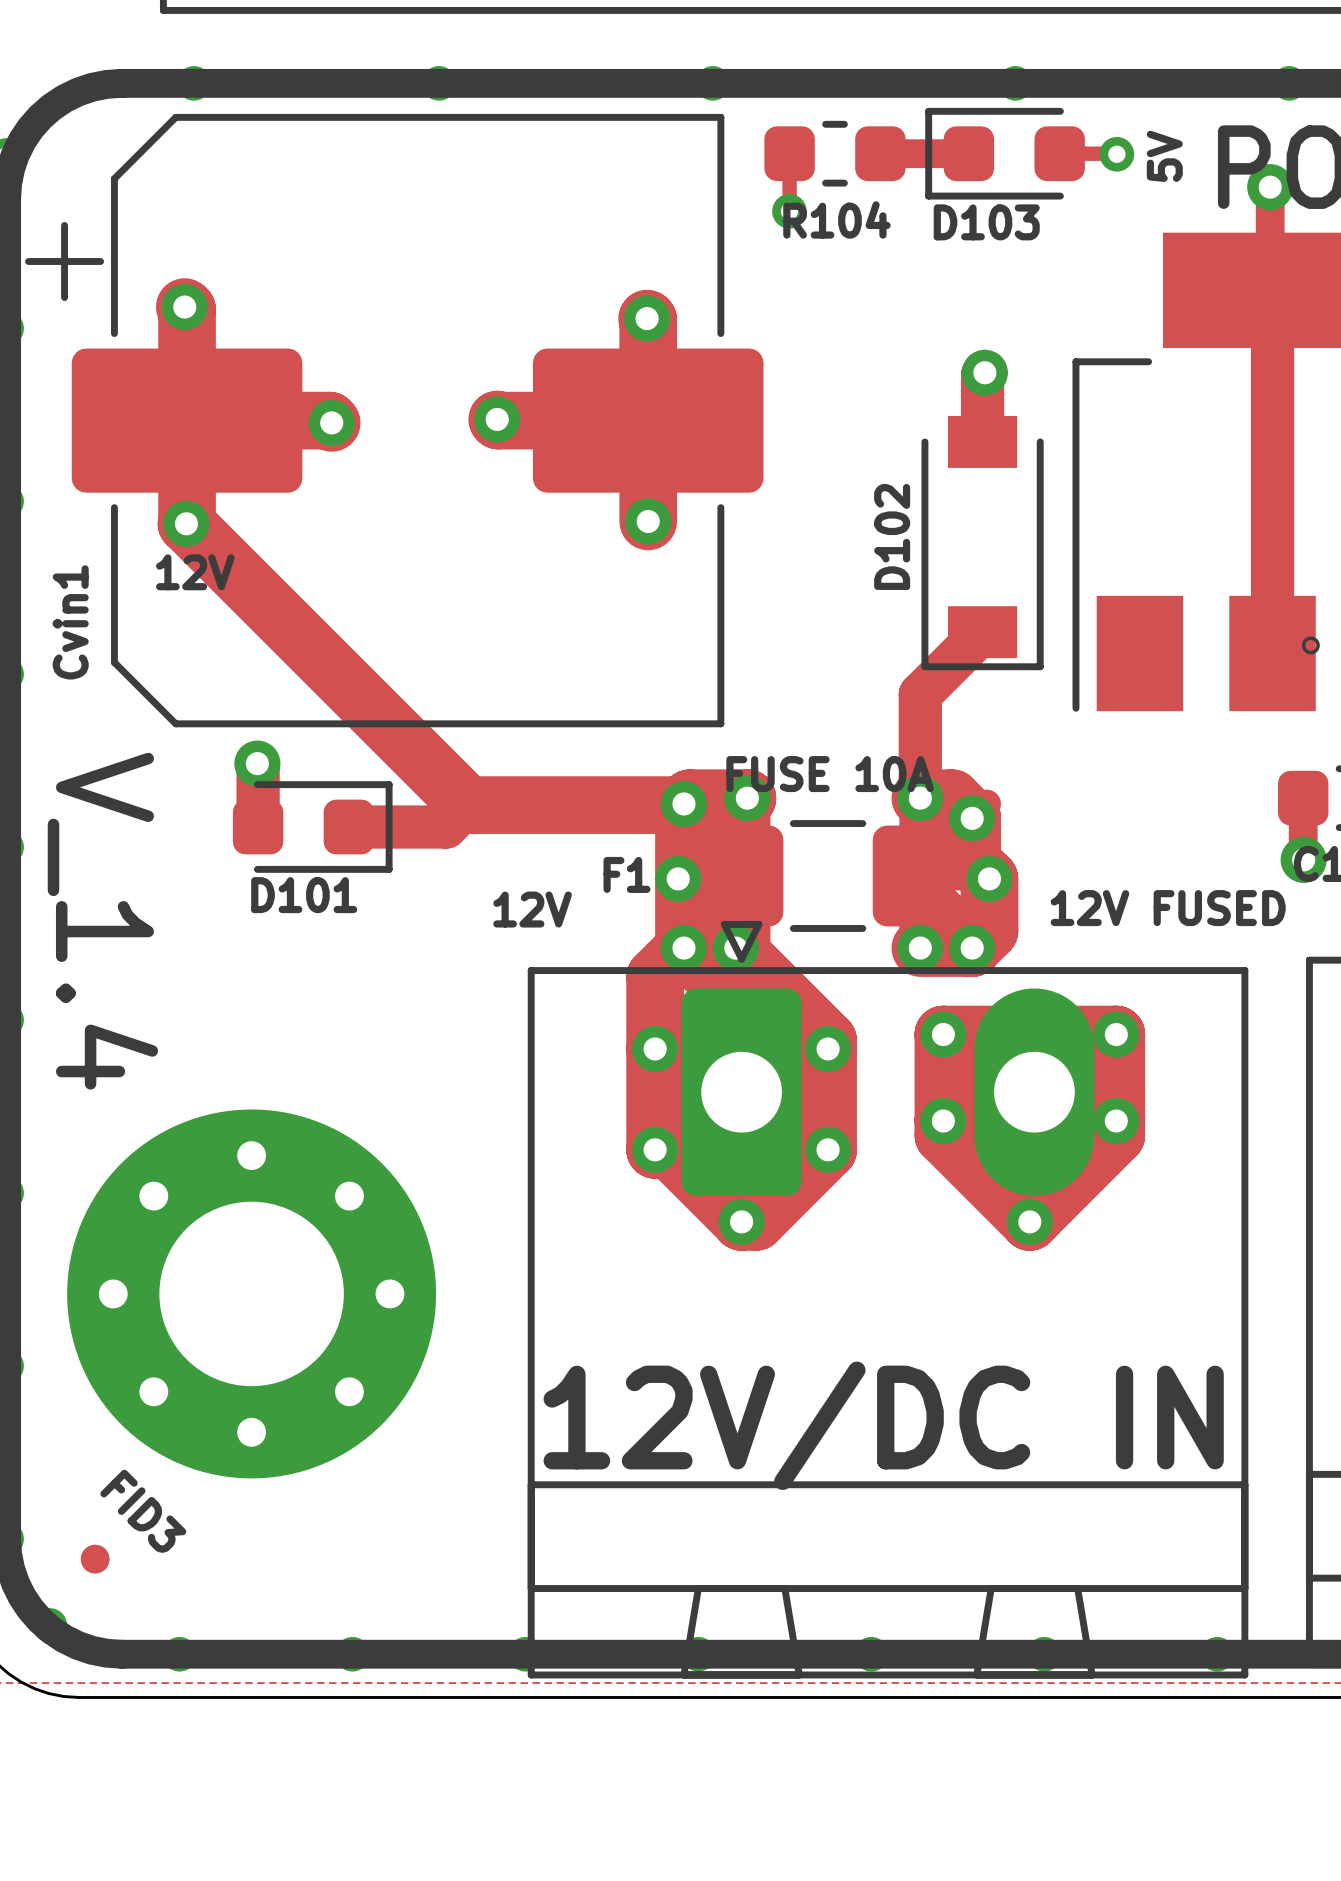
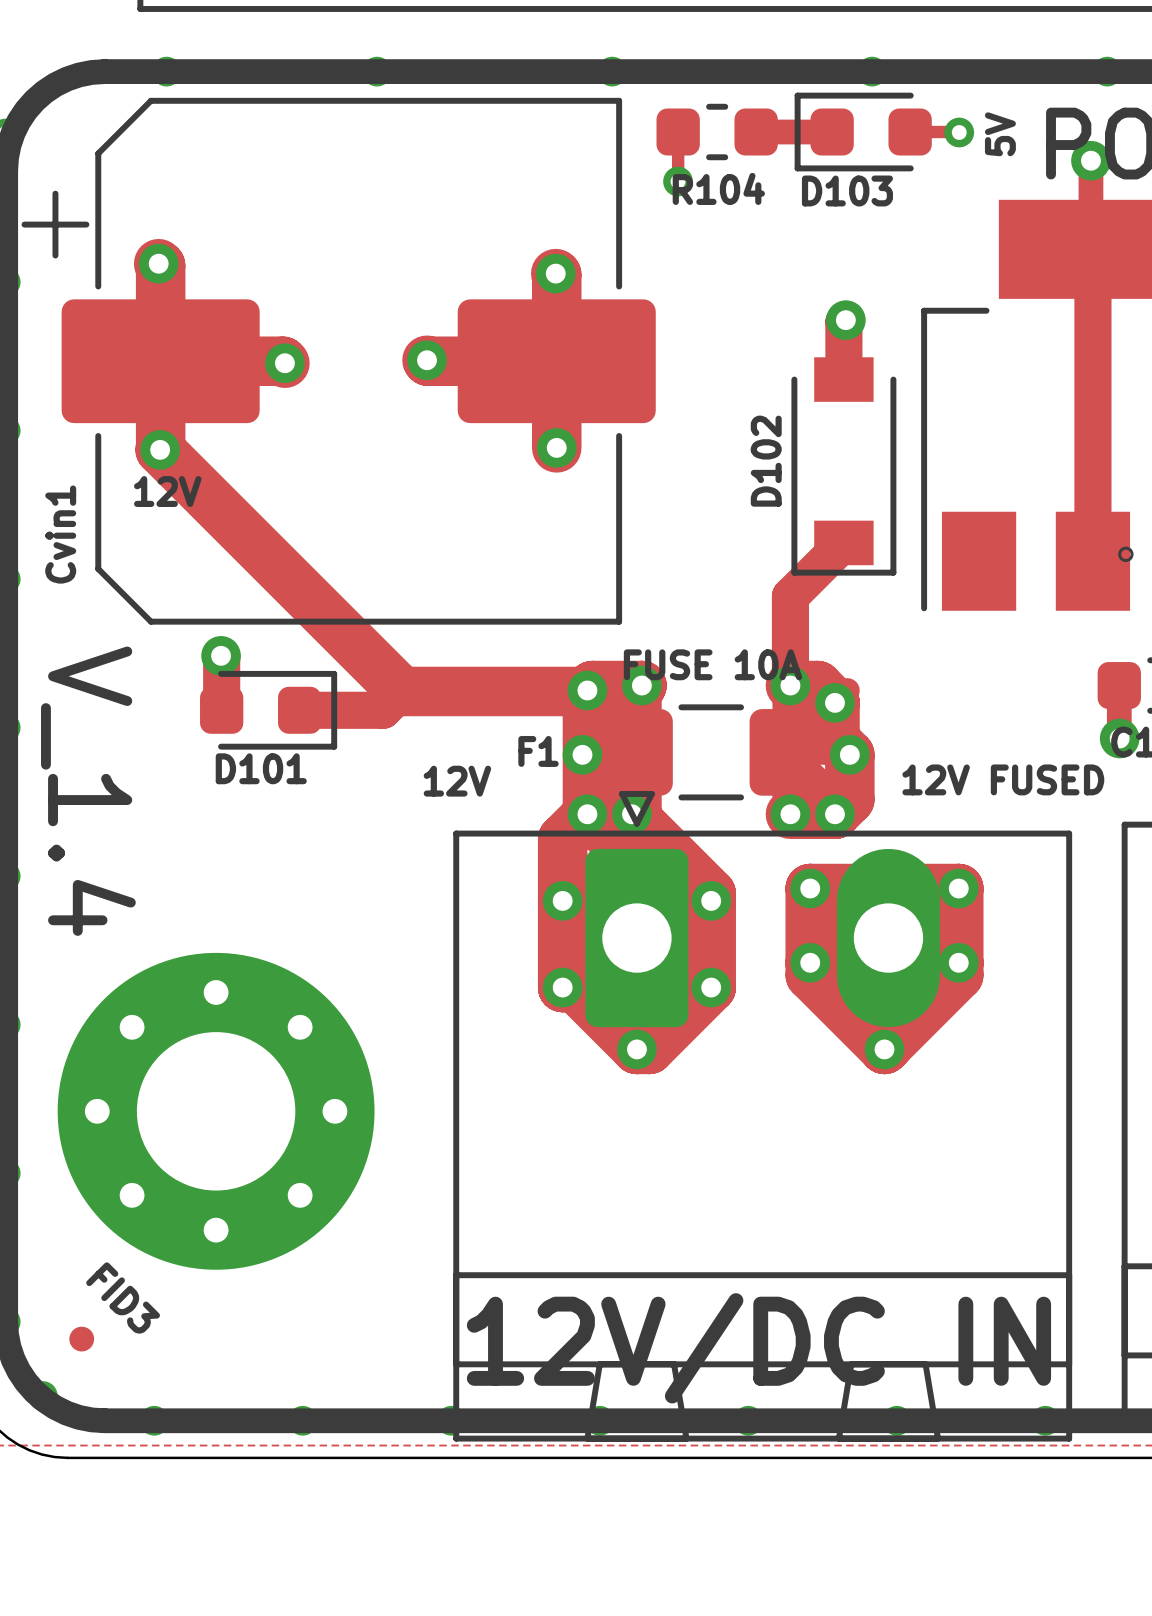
text position: 12V/DC IN (883, 1425) -> 12V/DC IN (758, 1348)

